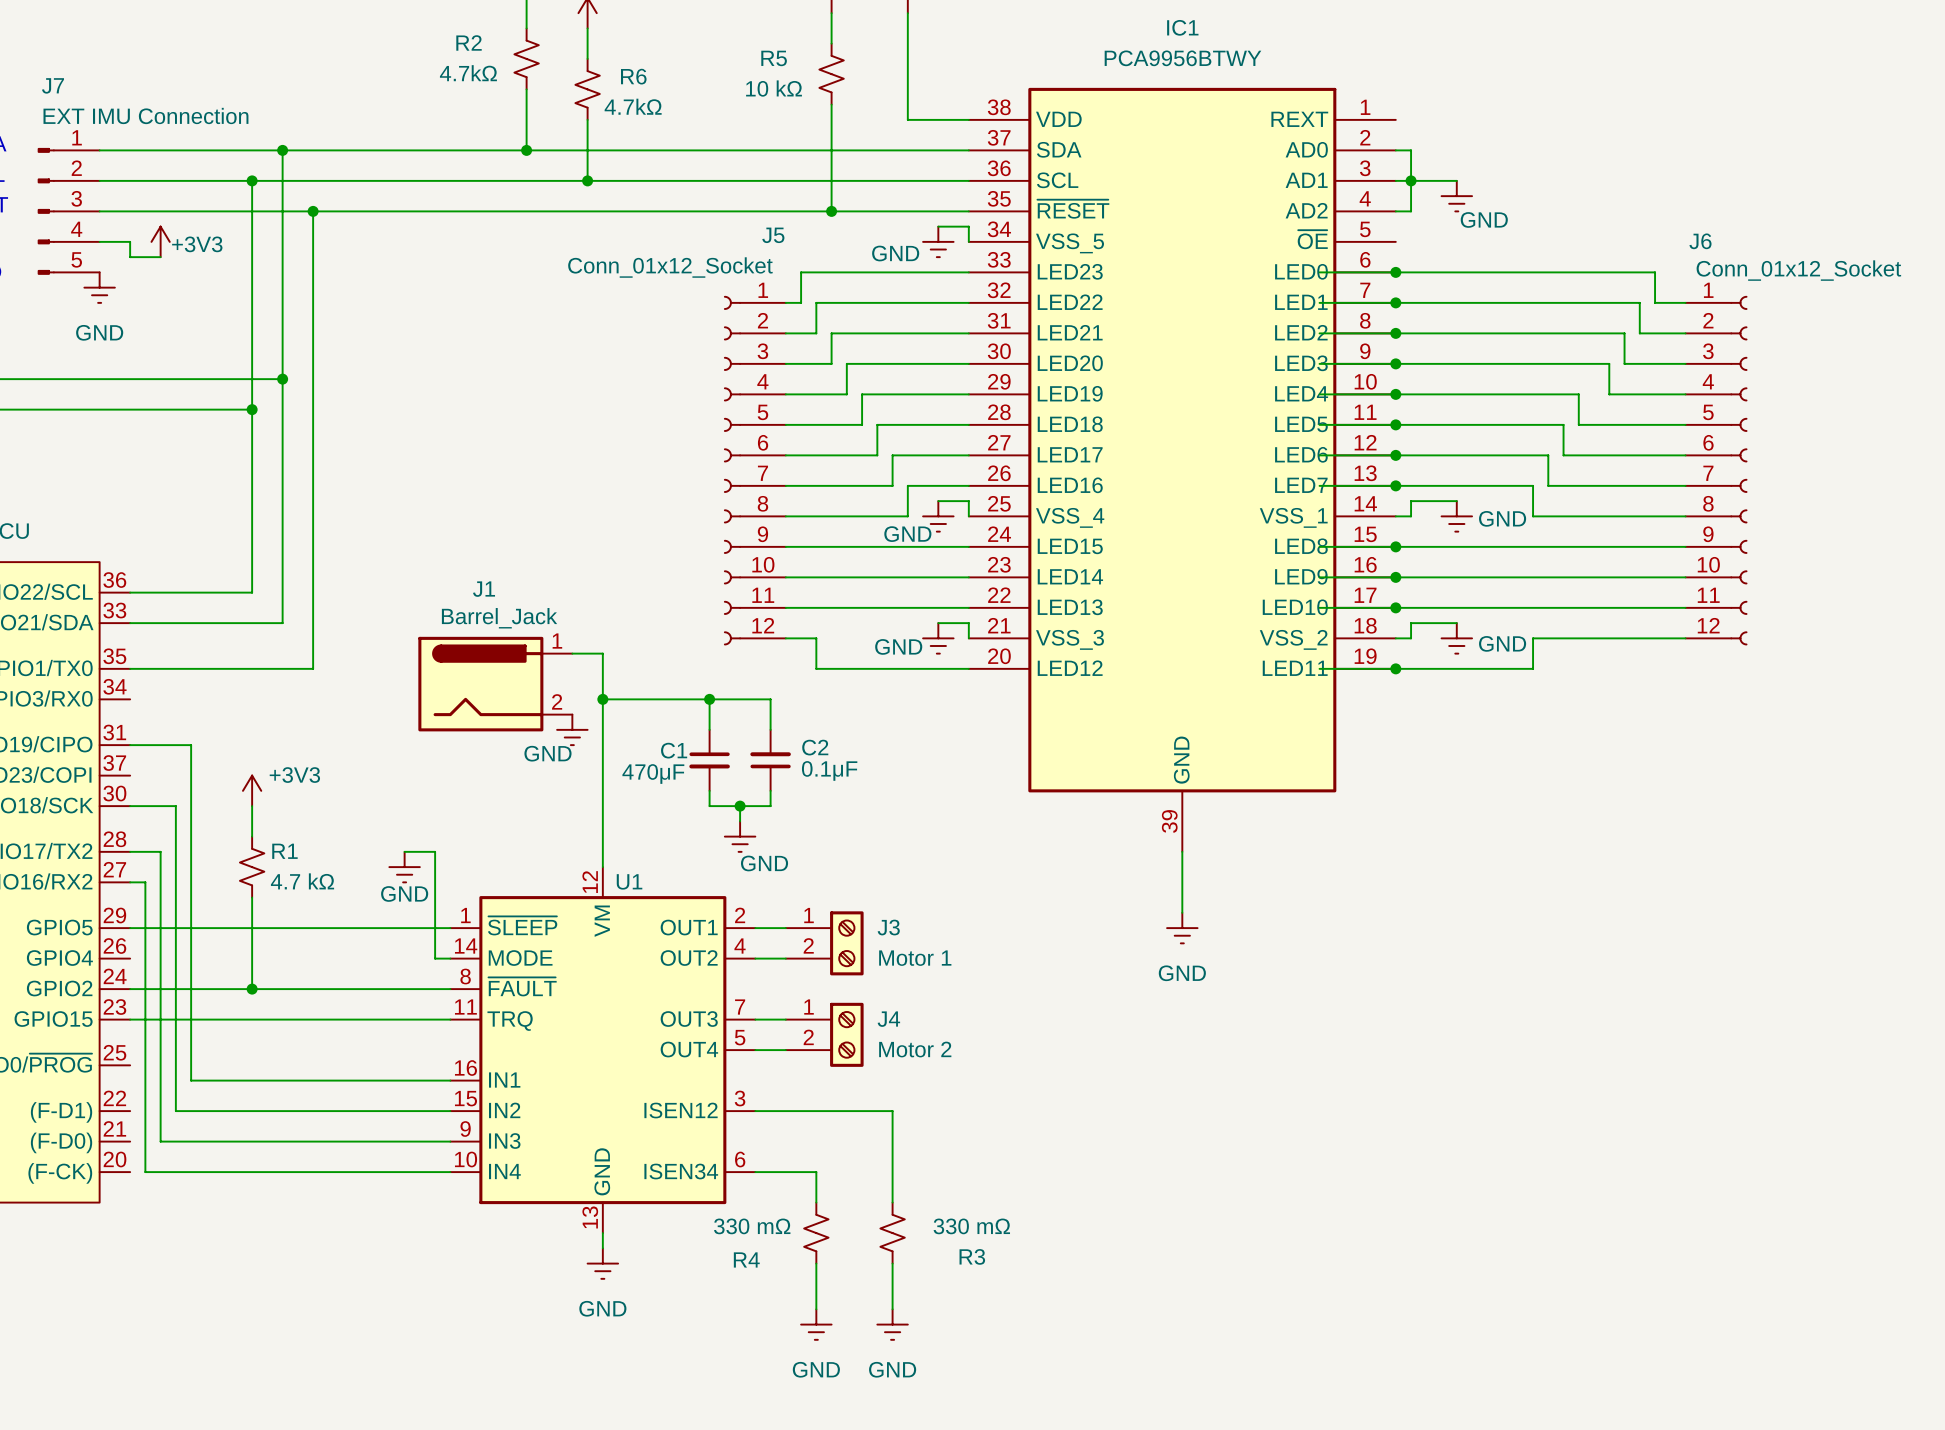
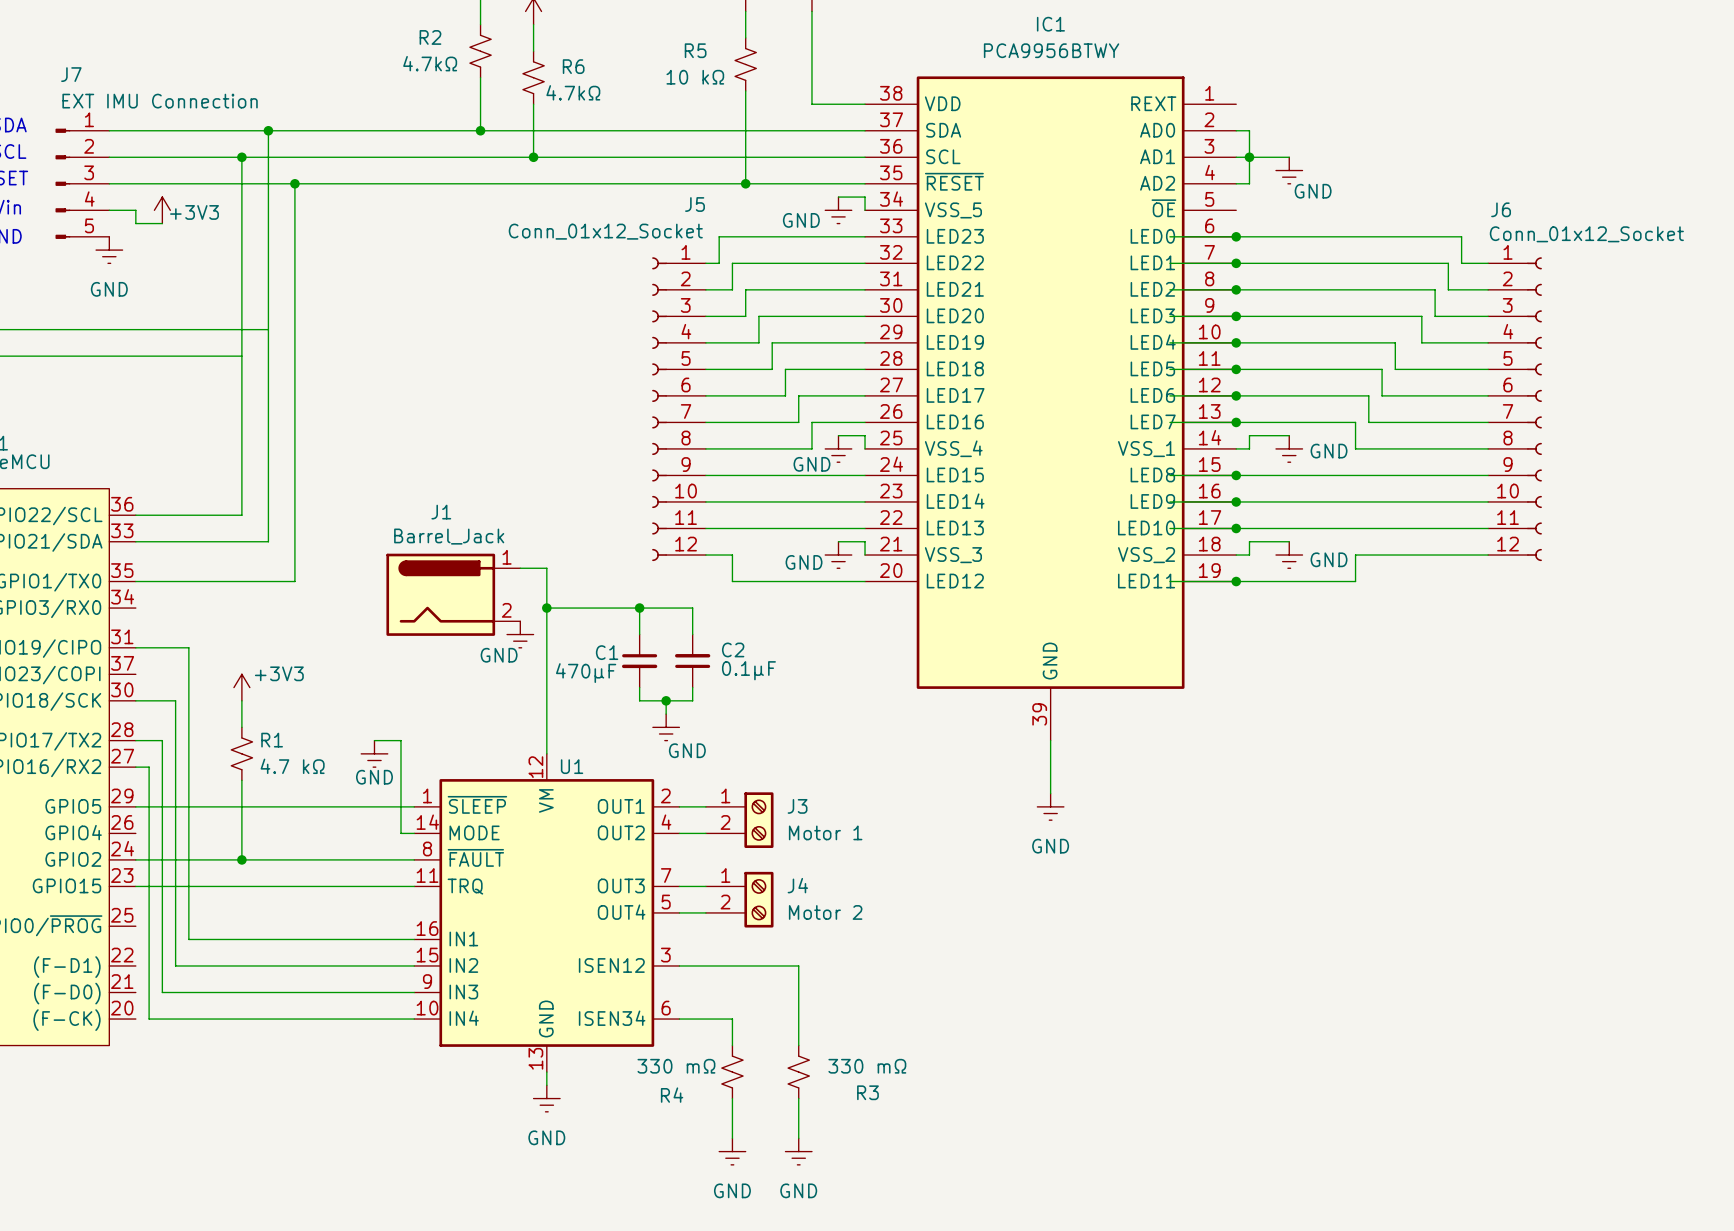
junction: (282, 379) -> none
junction: (252, 409) -> none

